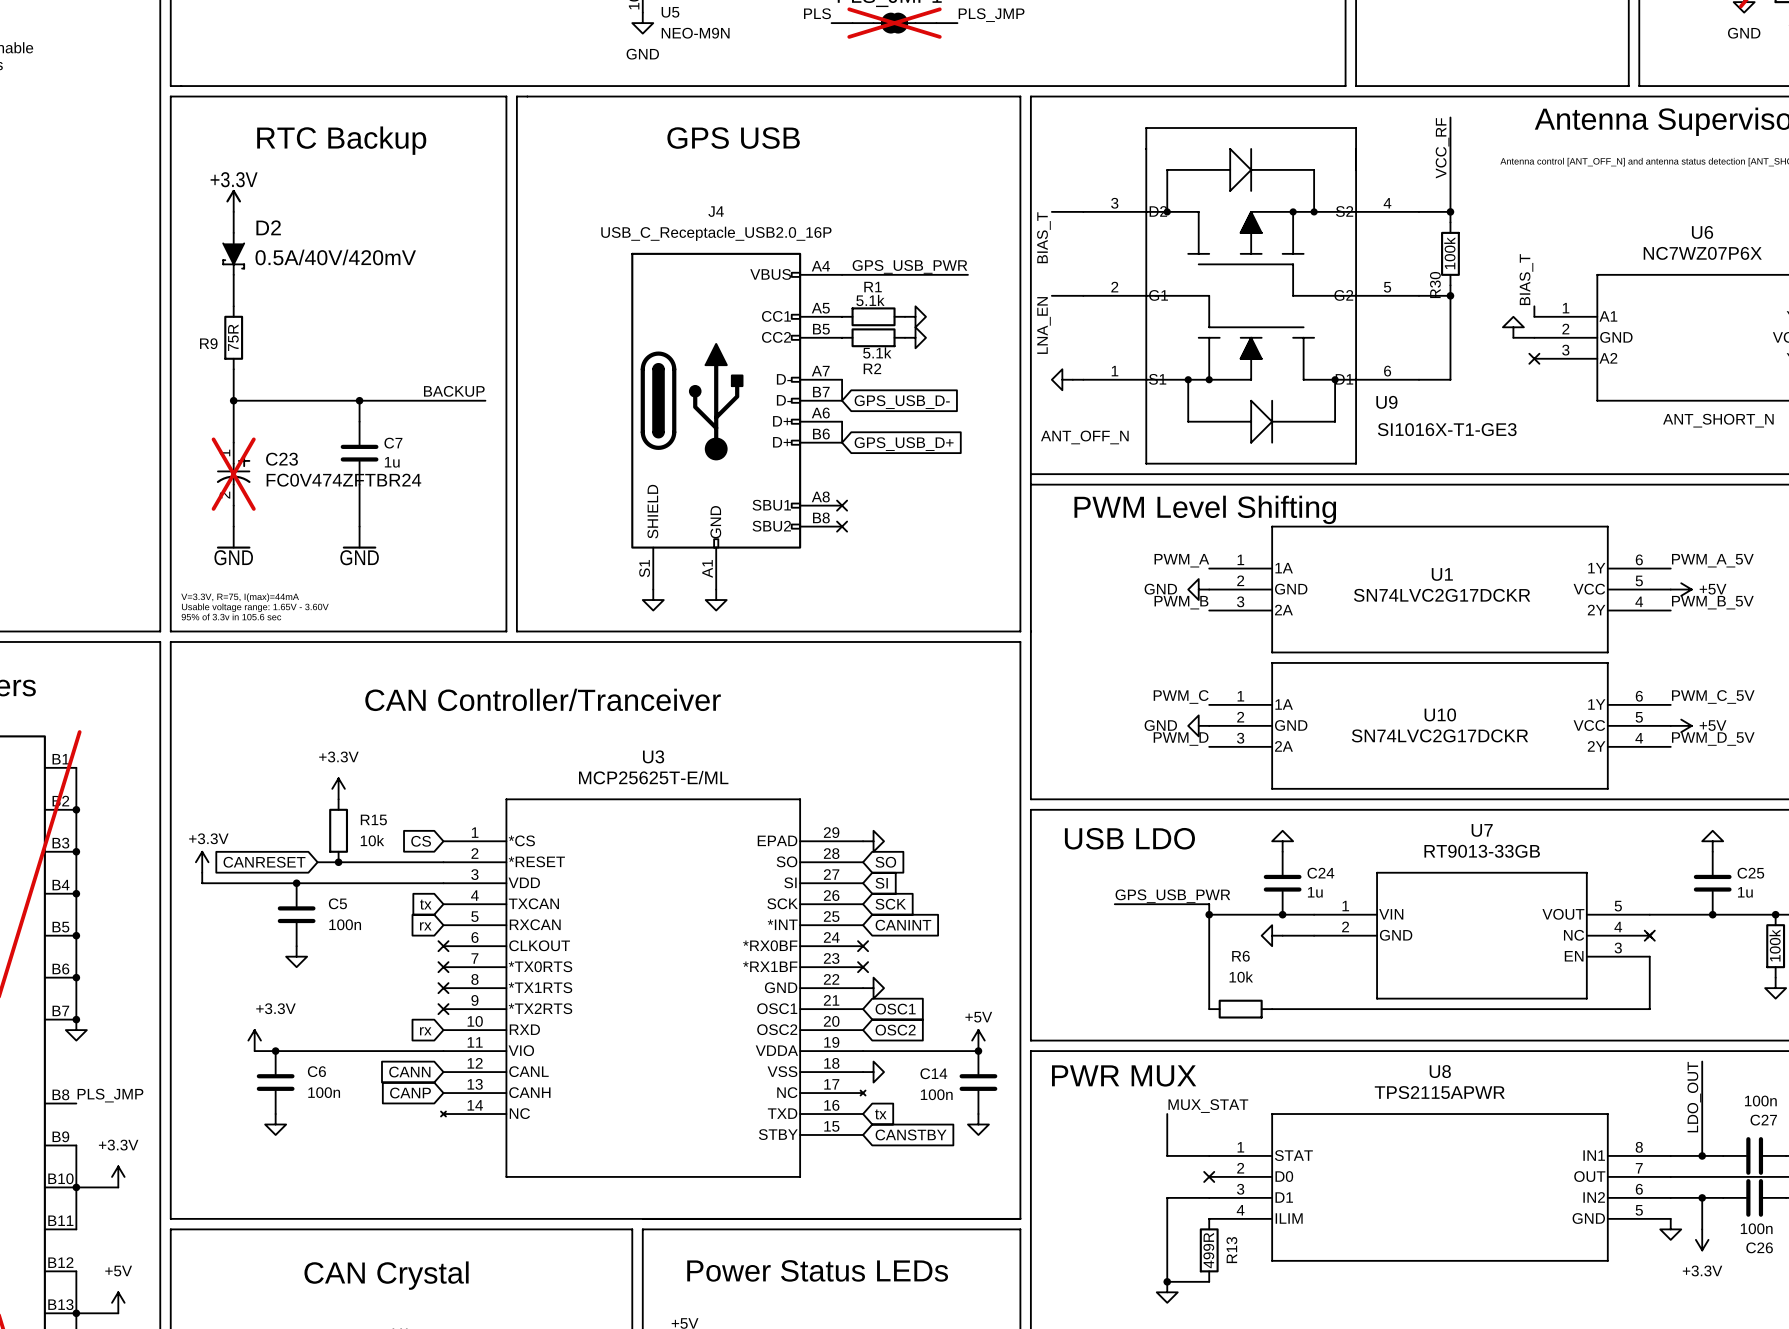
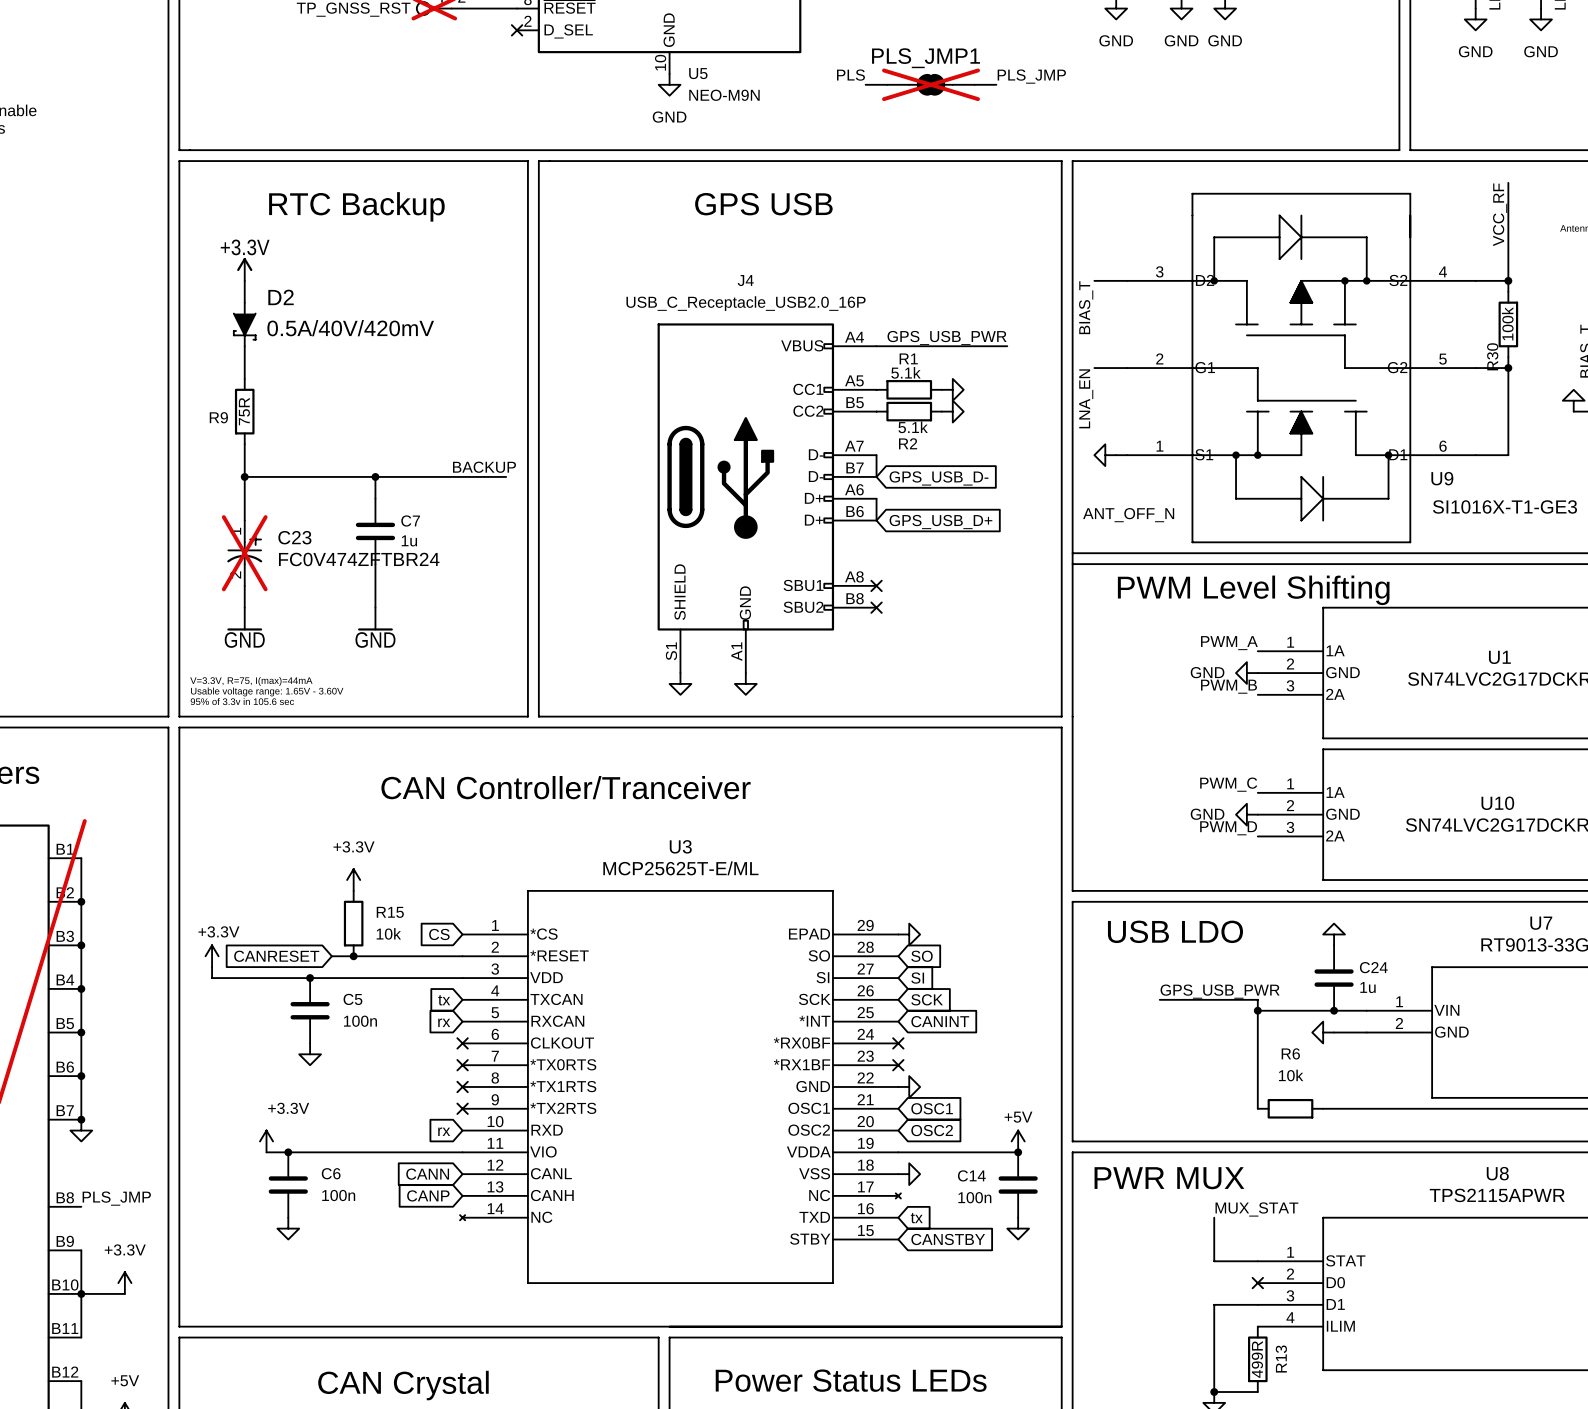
label position: BACKUP (454, 391) -> BACKUP (484, 467)

